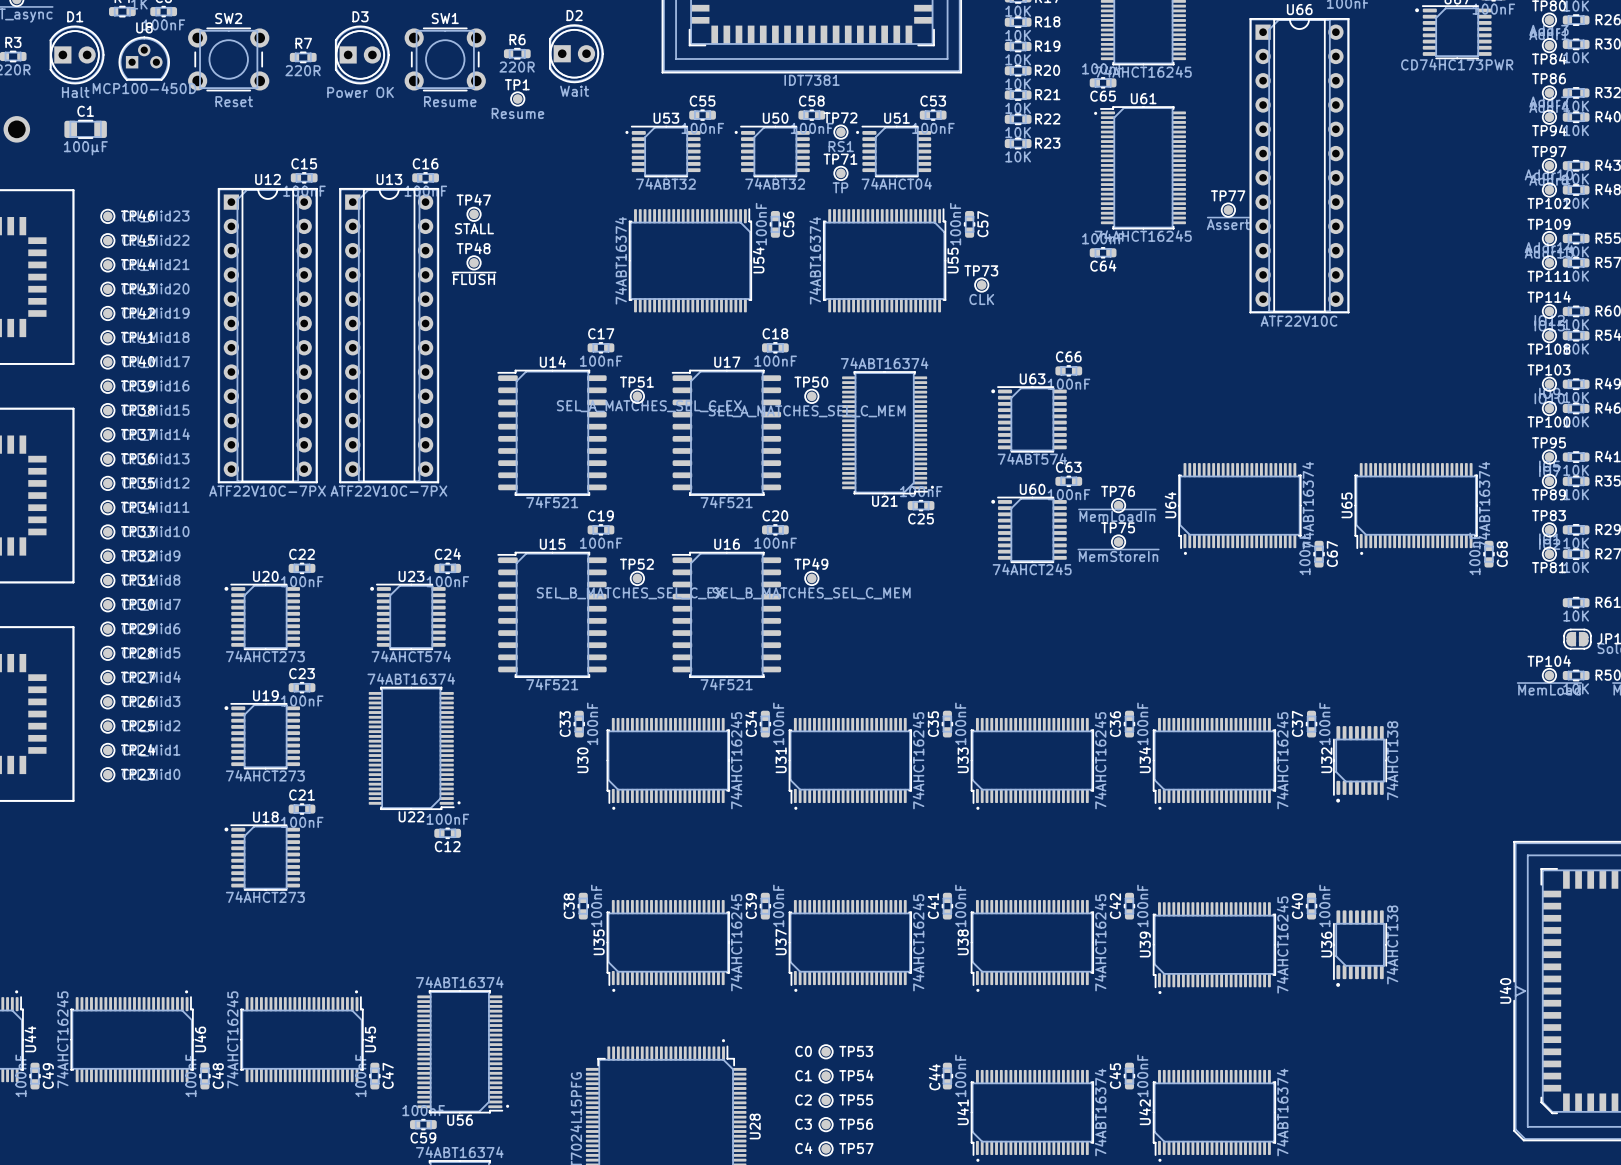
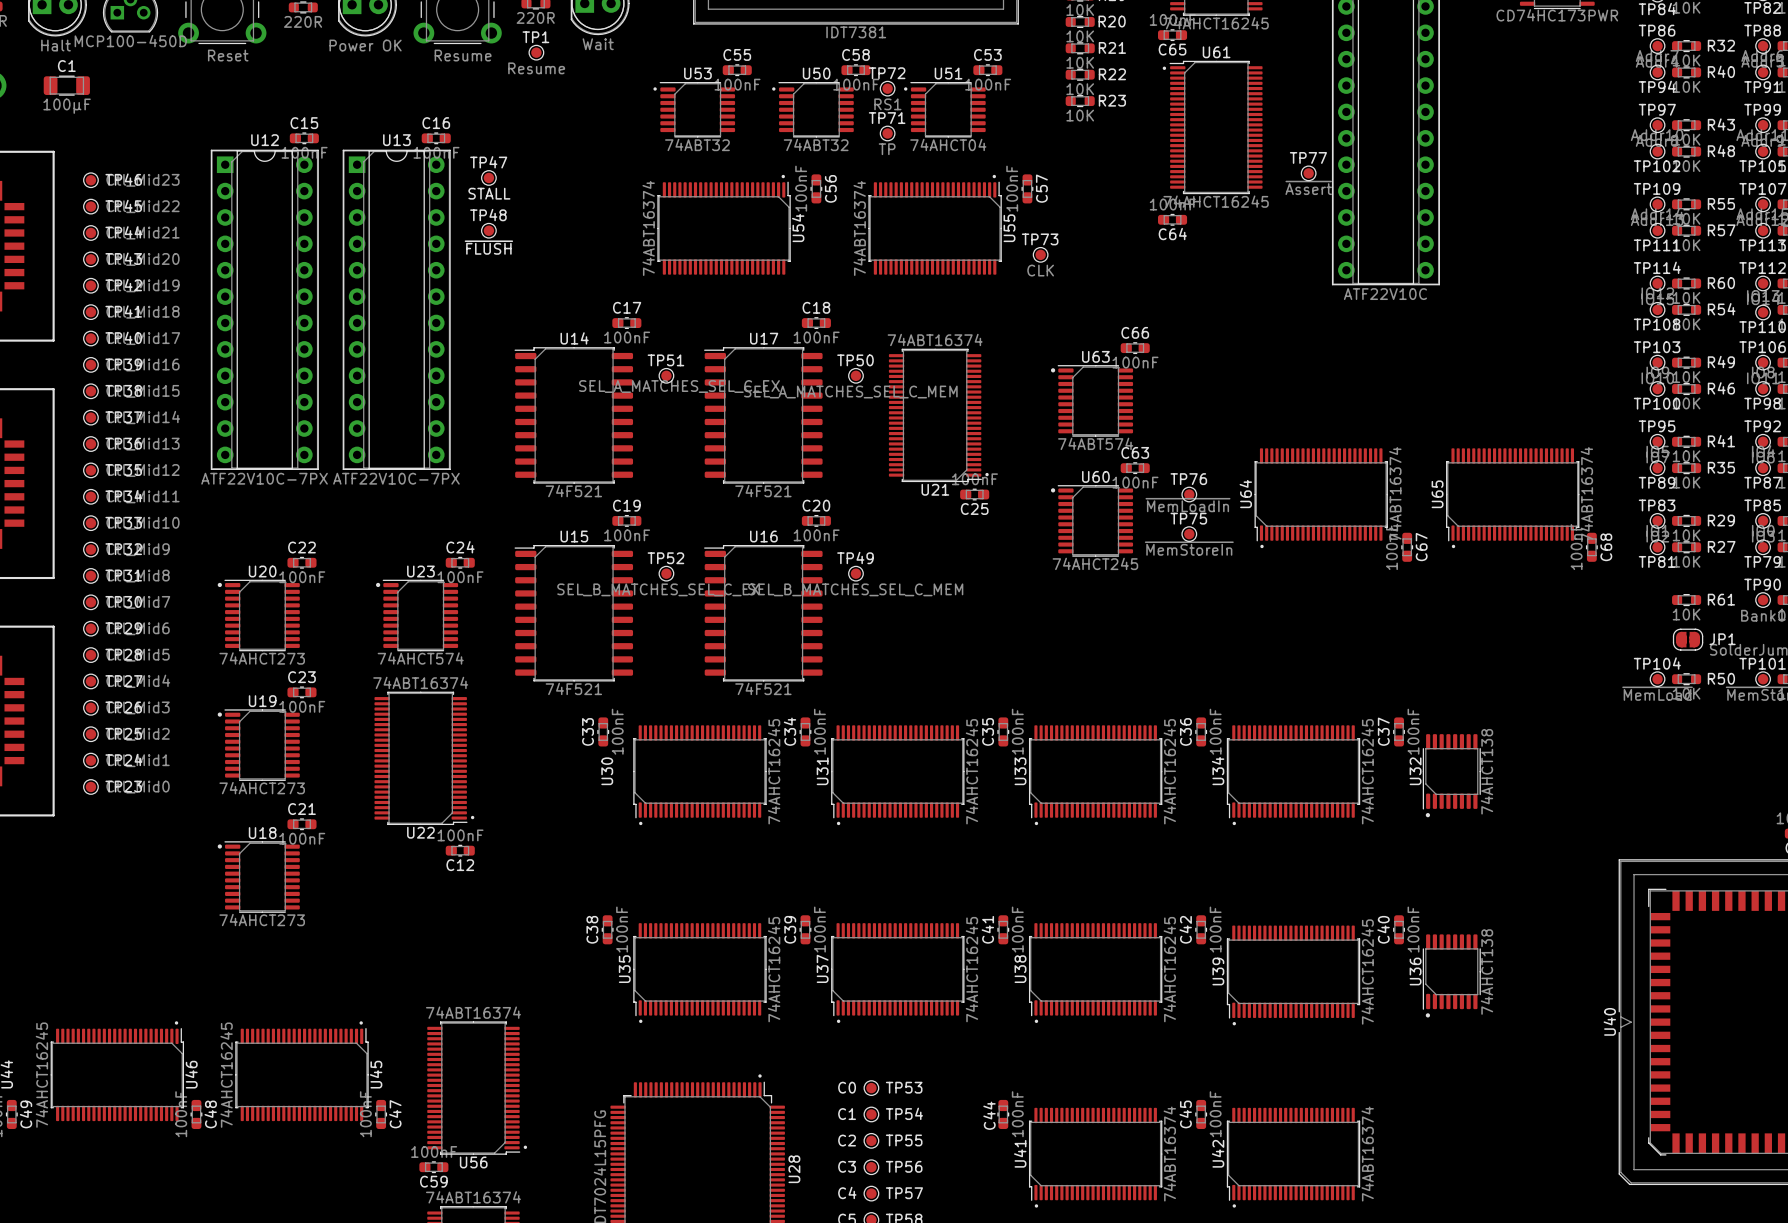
U54 footprint: [629, 208, 752, 313] -> [657, 174, 791, 275]
U55 footprint: [823, 208, 946, 313] -> [868, 174, 1002, 275]

